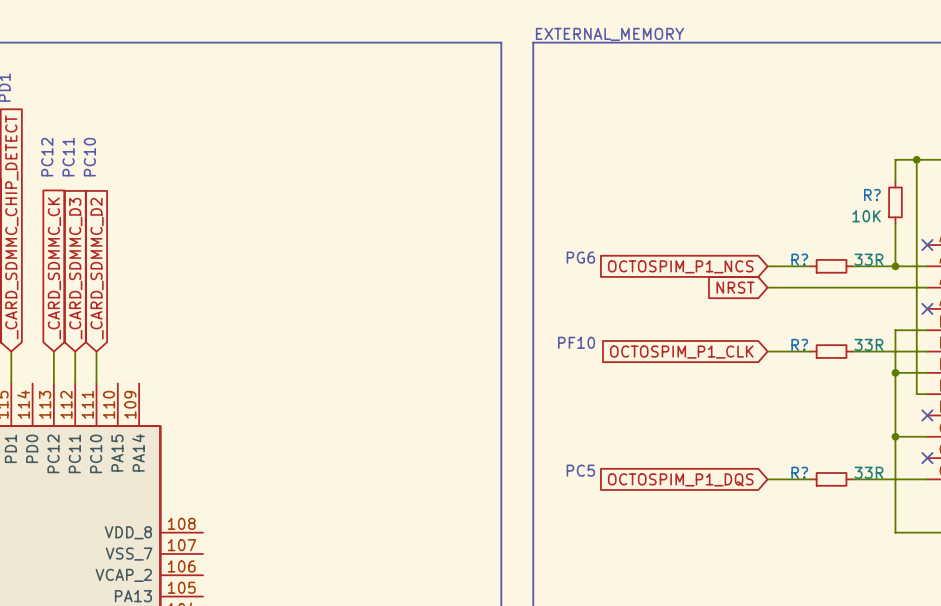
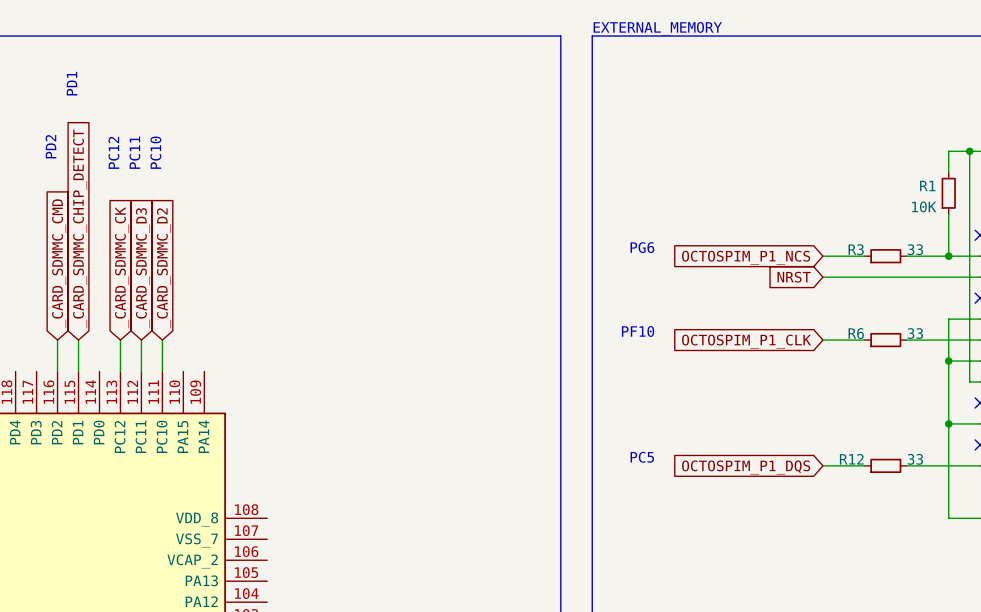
R? name: R? (872, 195) -> R1 (927, 186)
R? name: R? (799, 259) -> R3 (856, 249)
R? value: 33R (868, 259) -> 33 (915, 249)
R? name: R? (799, 344) -> R6 (856, 333)
R? value: 33R (868, 344) -> 33 (915, 333)
R? name: R? (799, 472) -> R12 (851, 459)
R? value: 33R (868, 472) -> 33 (915, 459)

